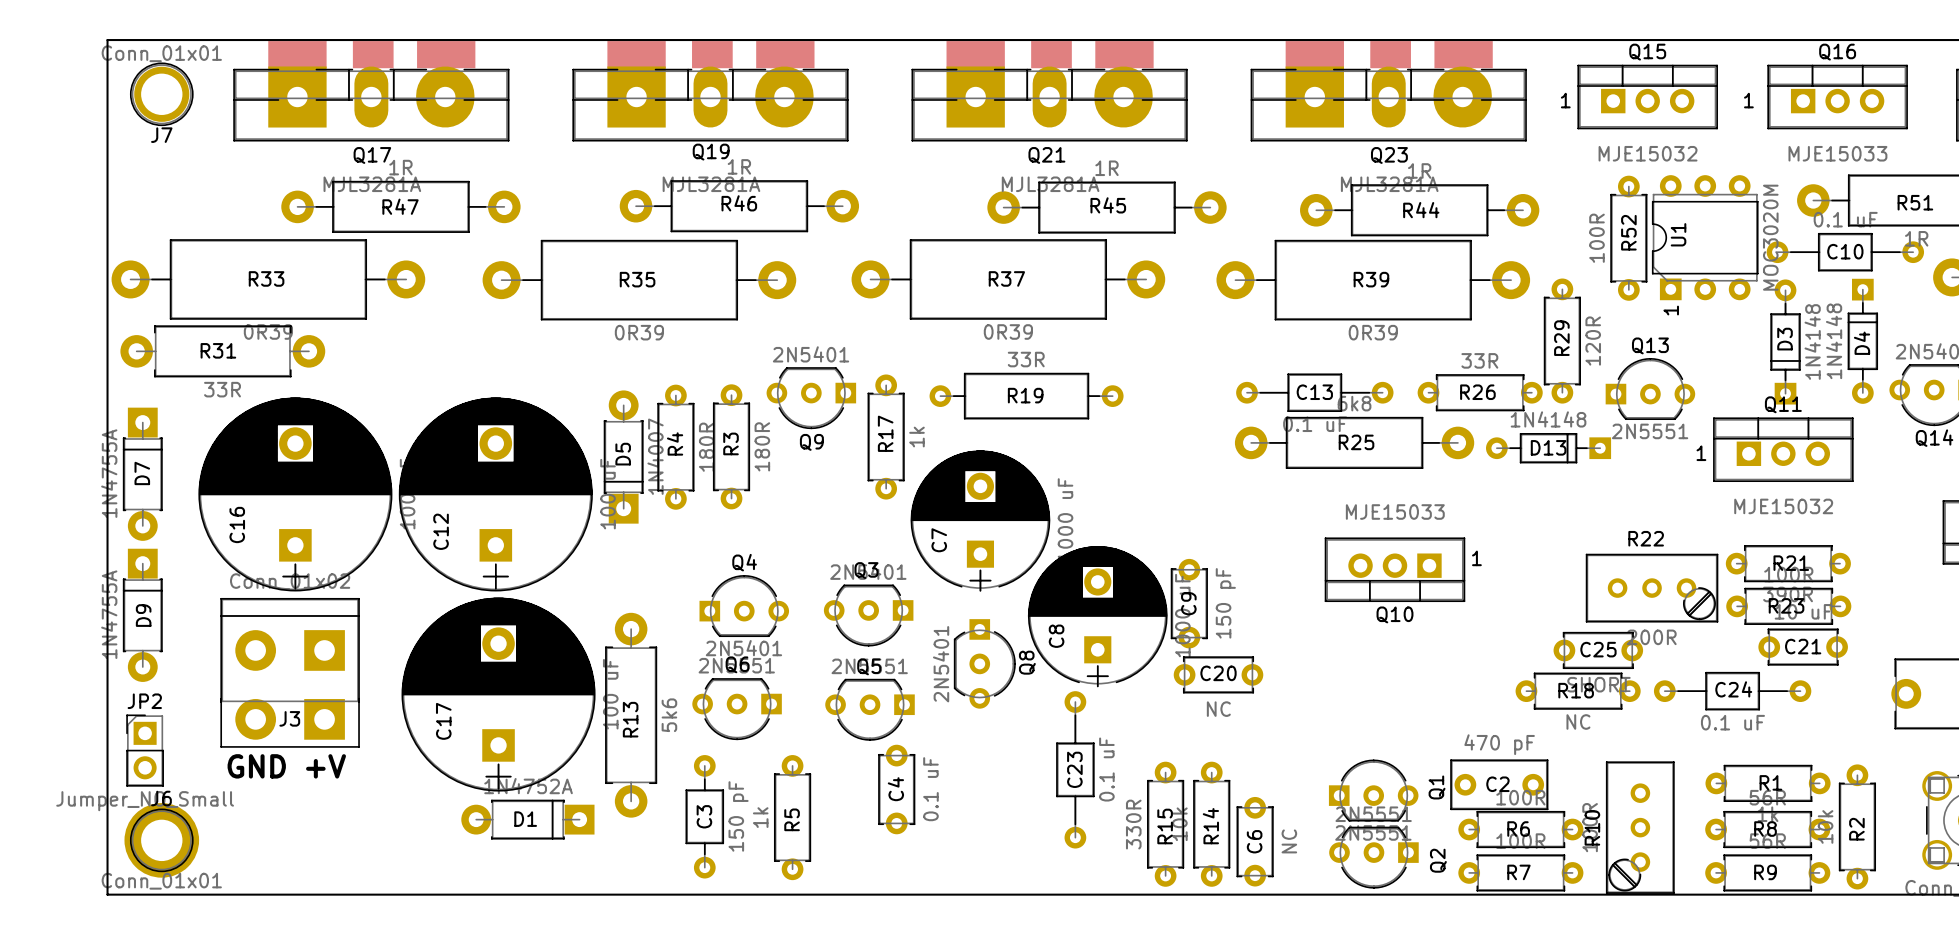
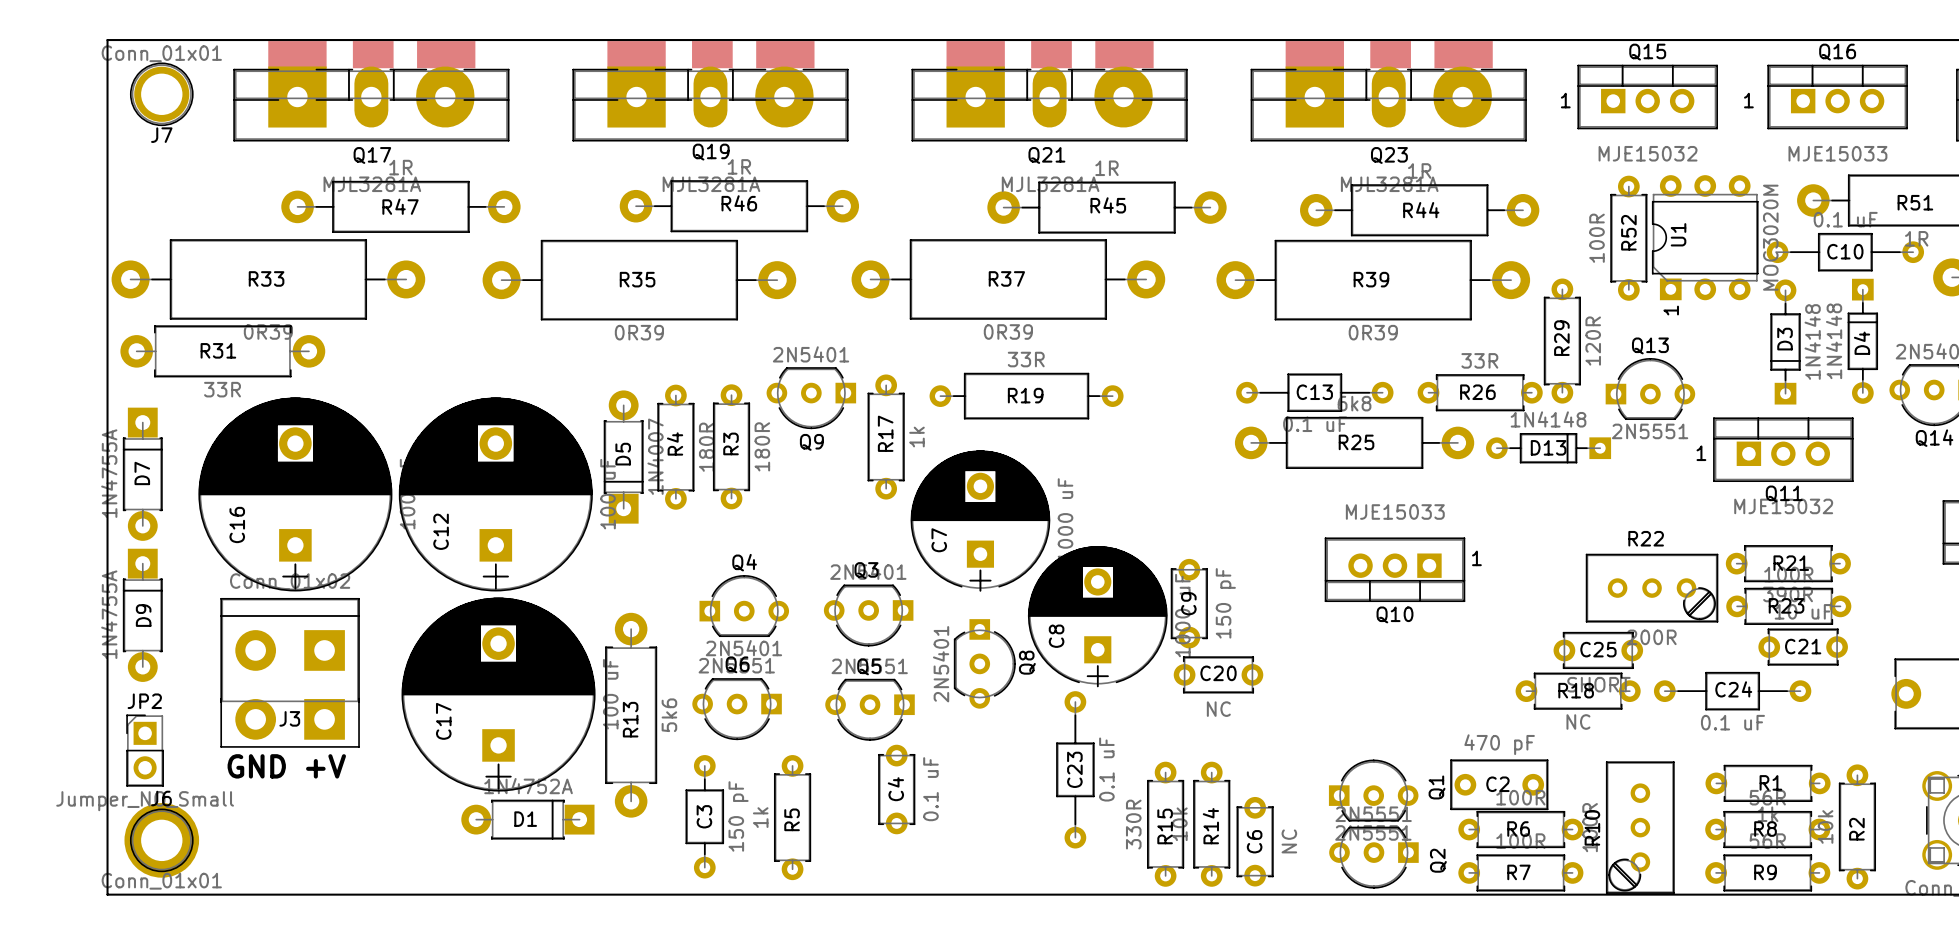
Q11 name position: Q11 (1783, 404) -> Q11 (1784, 493)

